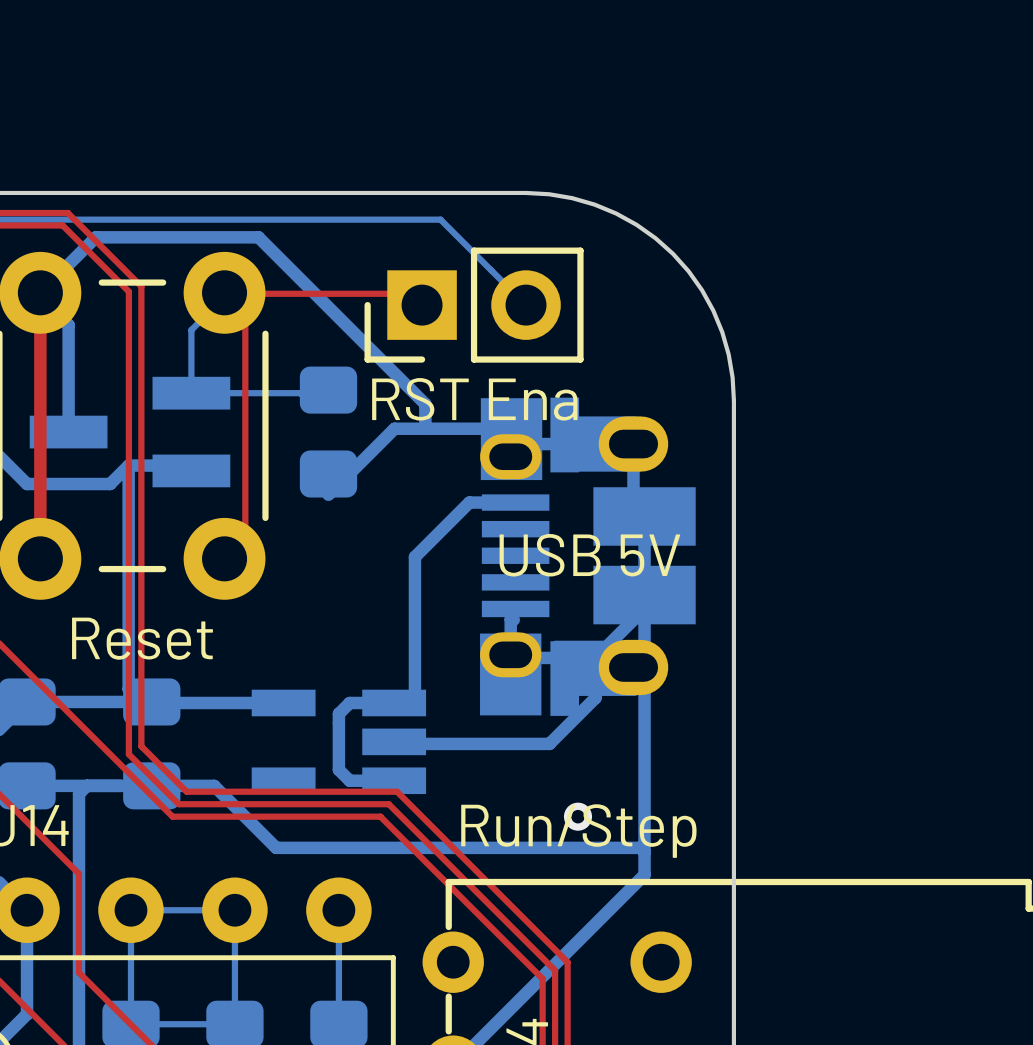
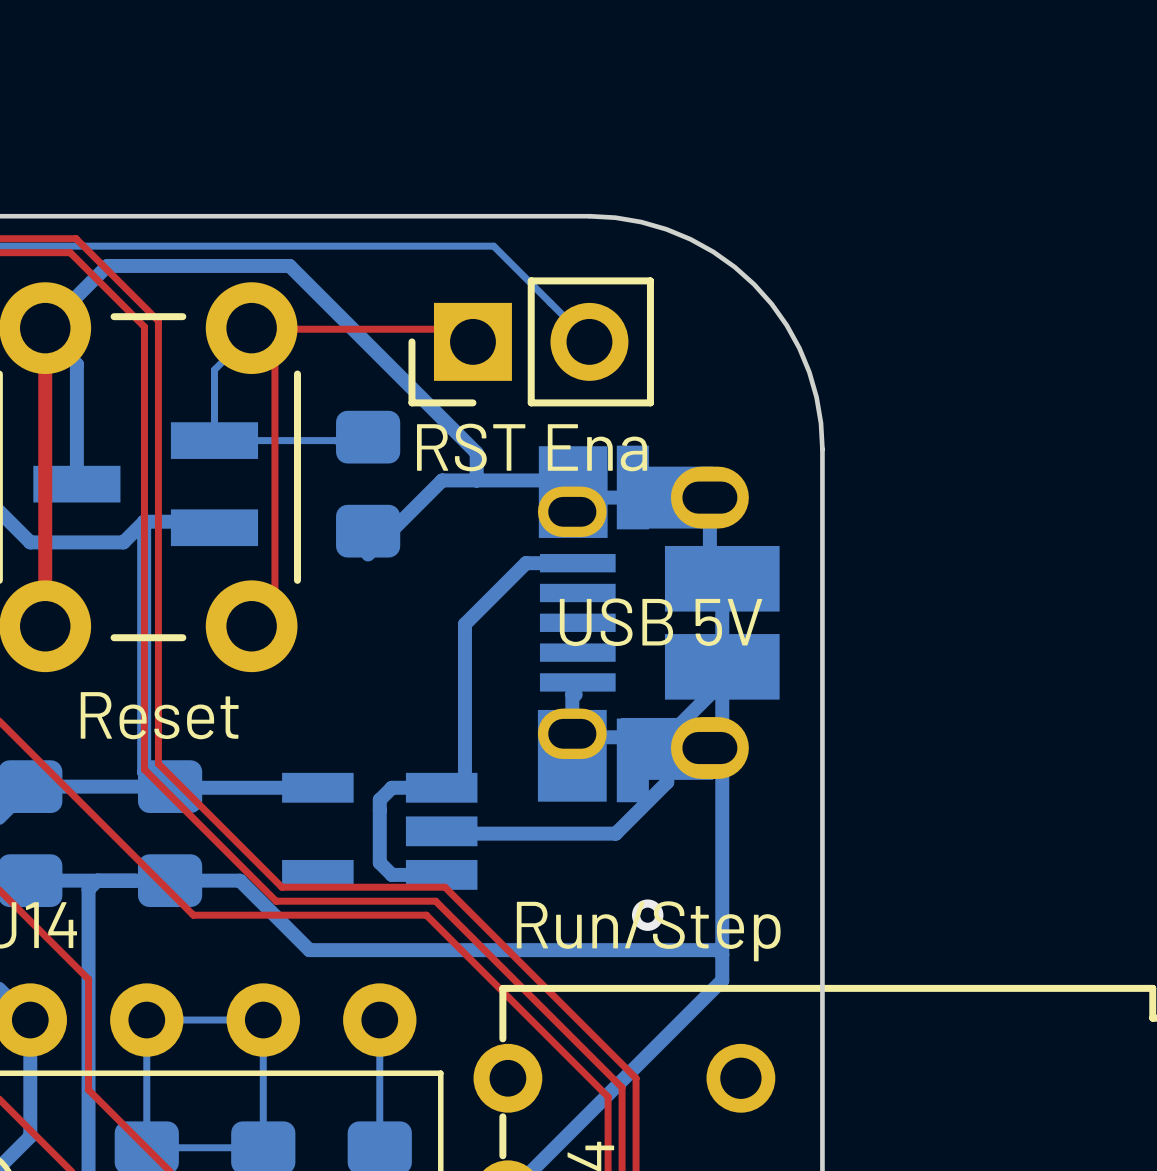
top track: (141, 681) (141, 746) (186, 791) (251, 791) -> (158, 763) (281, 887)
top track: (128, 686) (128, 754) (178, 804) (246, 804) -> (144, 769) (276, 901)

